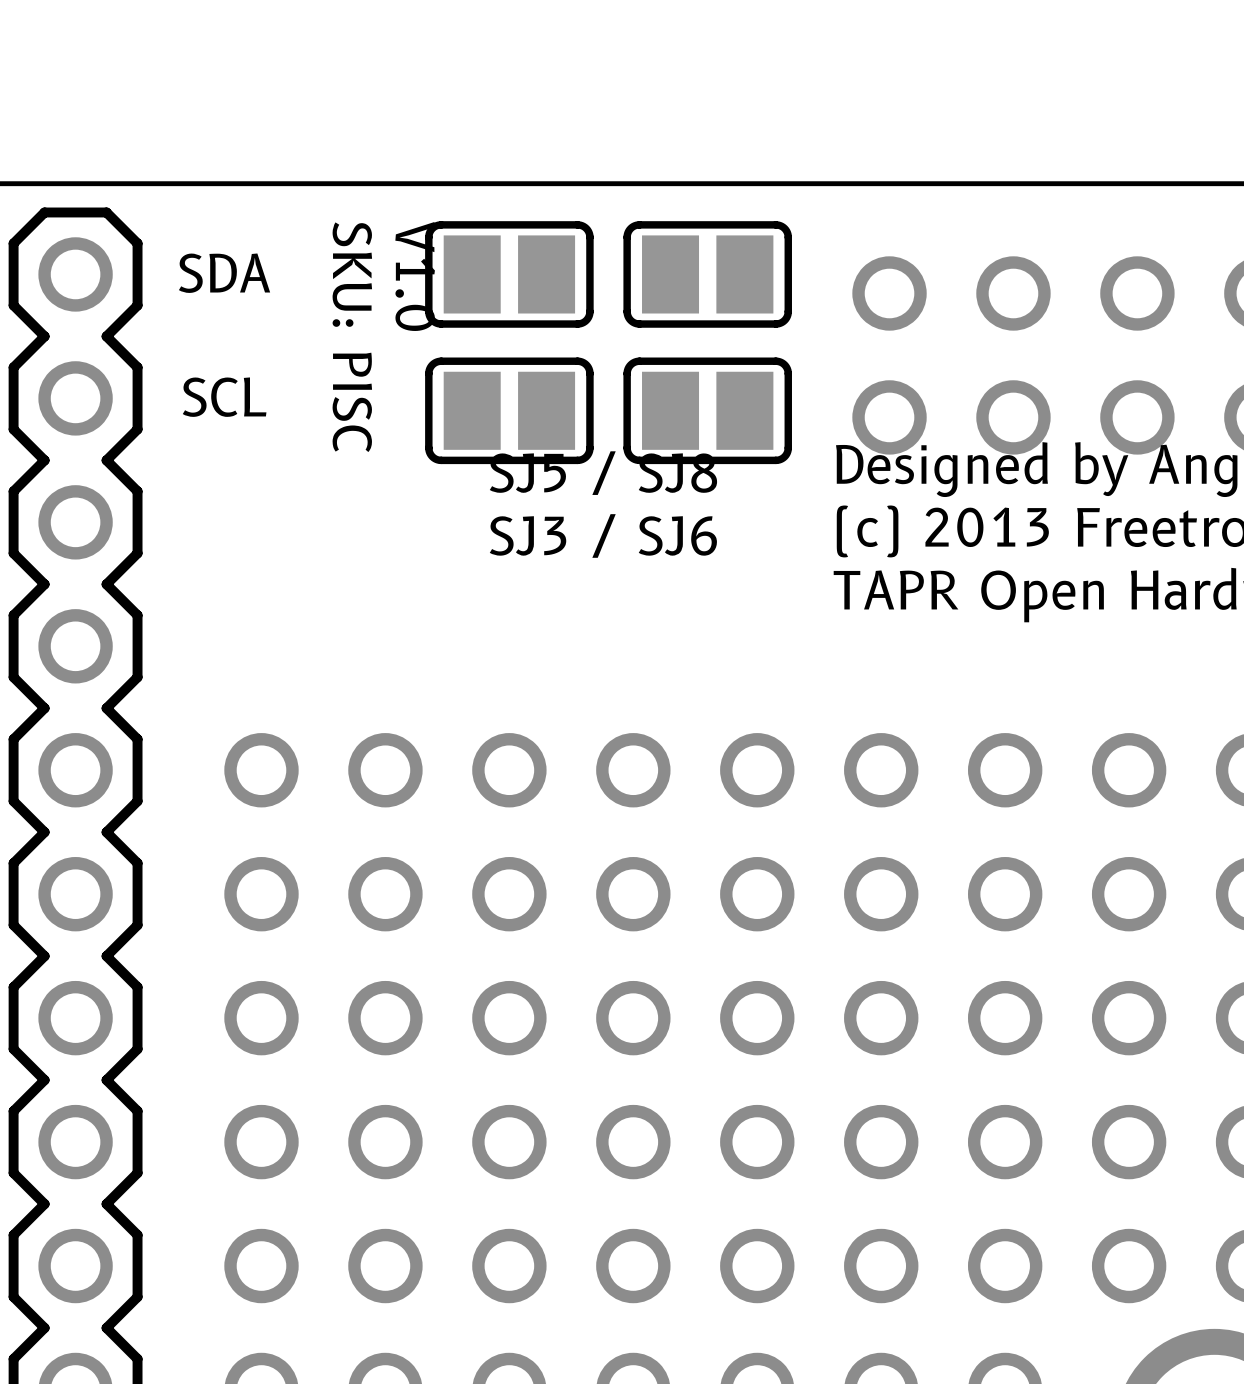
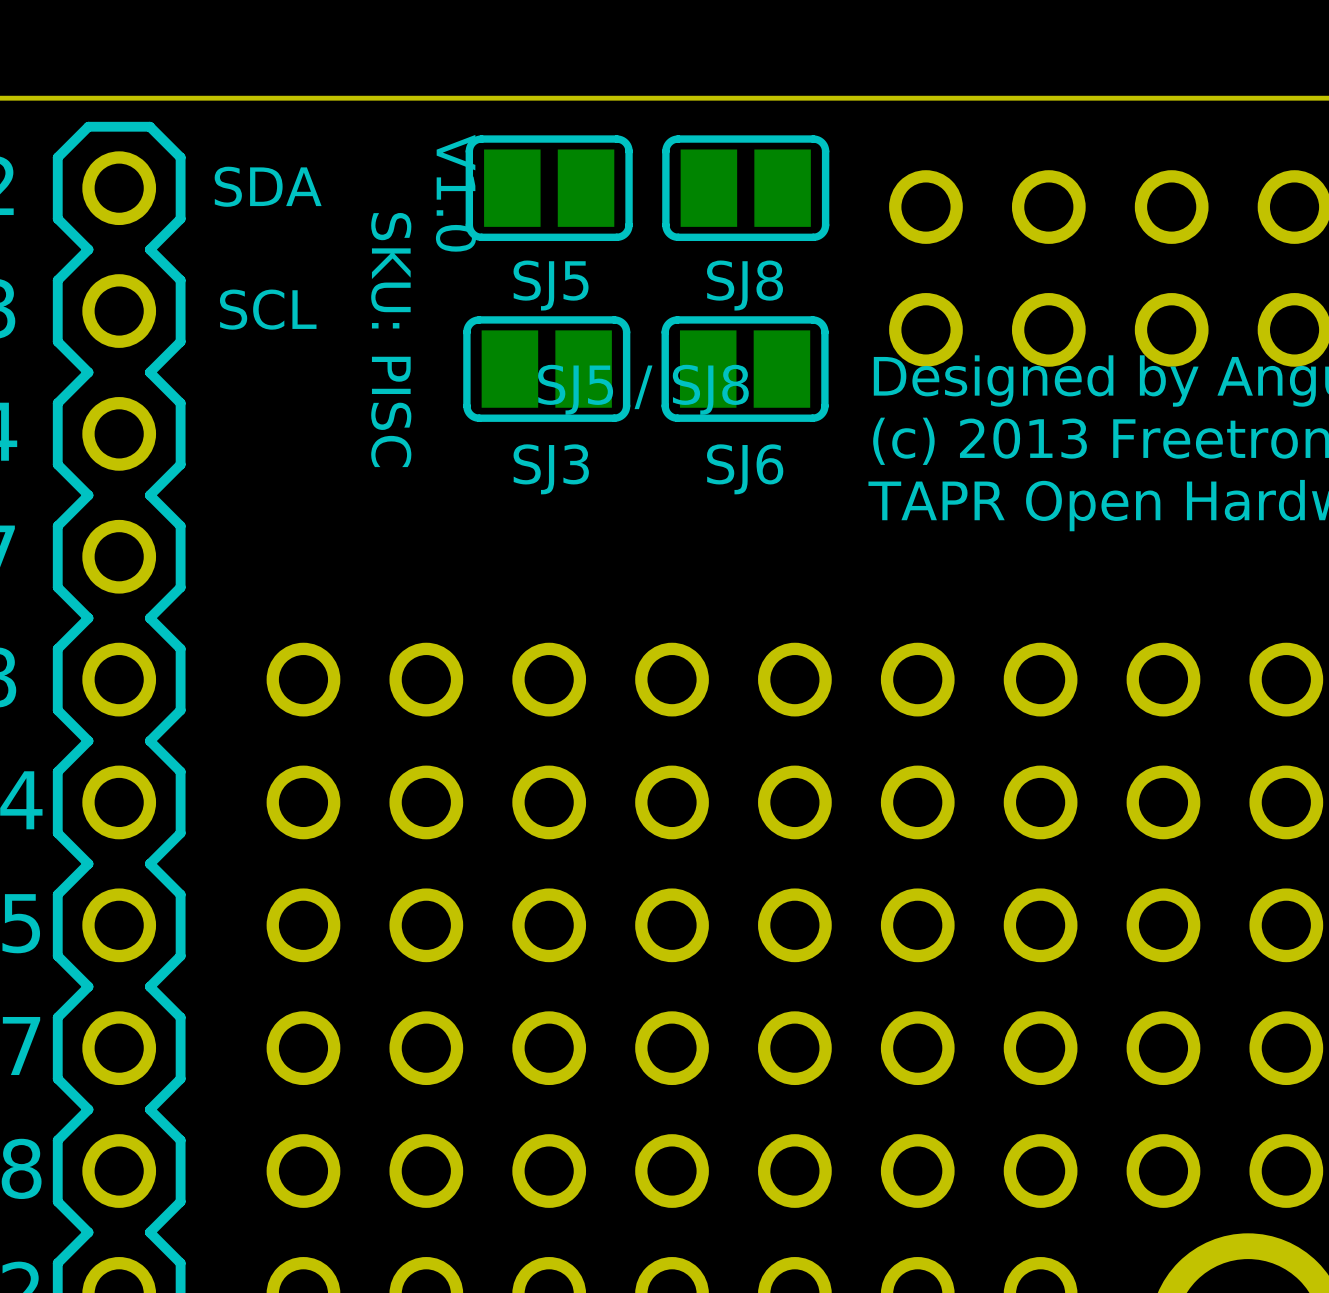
text position: SKU: PISC (352, 337) -> SKU: PISC (391, 340)
text: none -> SJ5 (551, 285)
text: none -> SJ8 (745, 285)
part position: (509, 410) -> (546, 369)
part position: (707, 410) -> (745, 369)
text: SJ3 / SJ6 (603, 535) -> none
text: none -> SJ3 (551, 469)
text: none -> SJ6 (745, 469)

